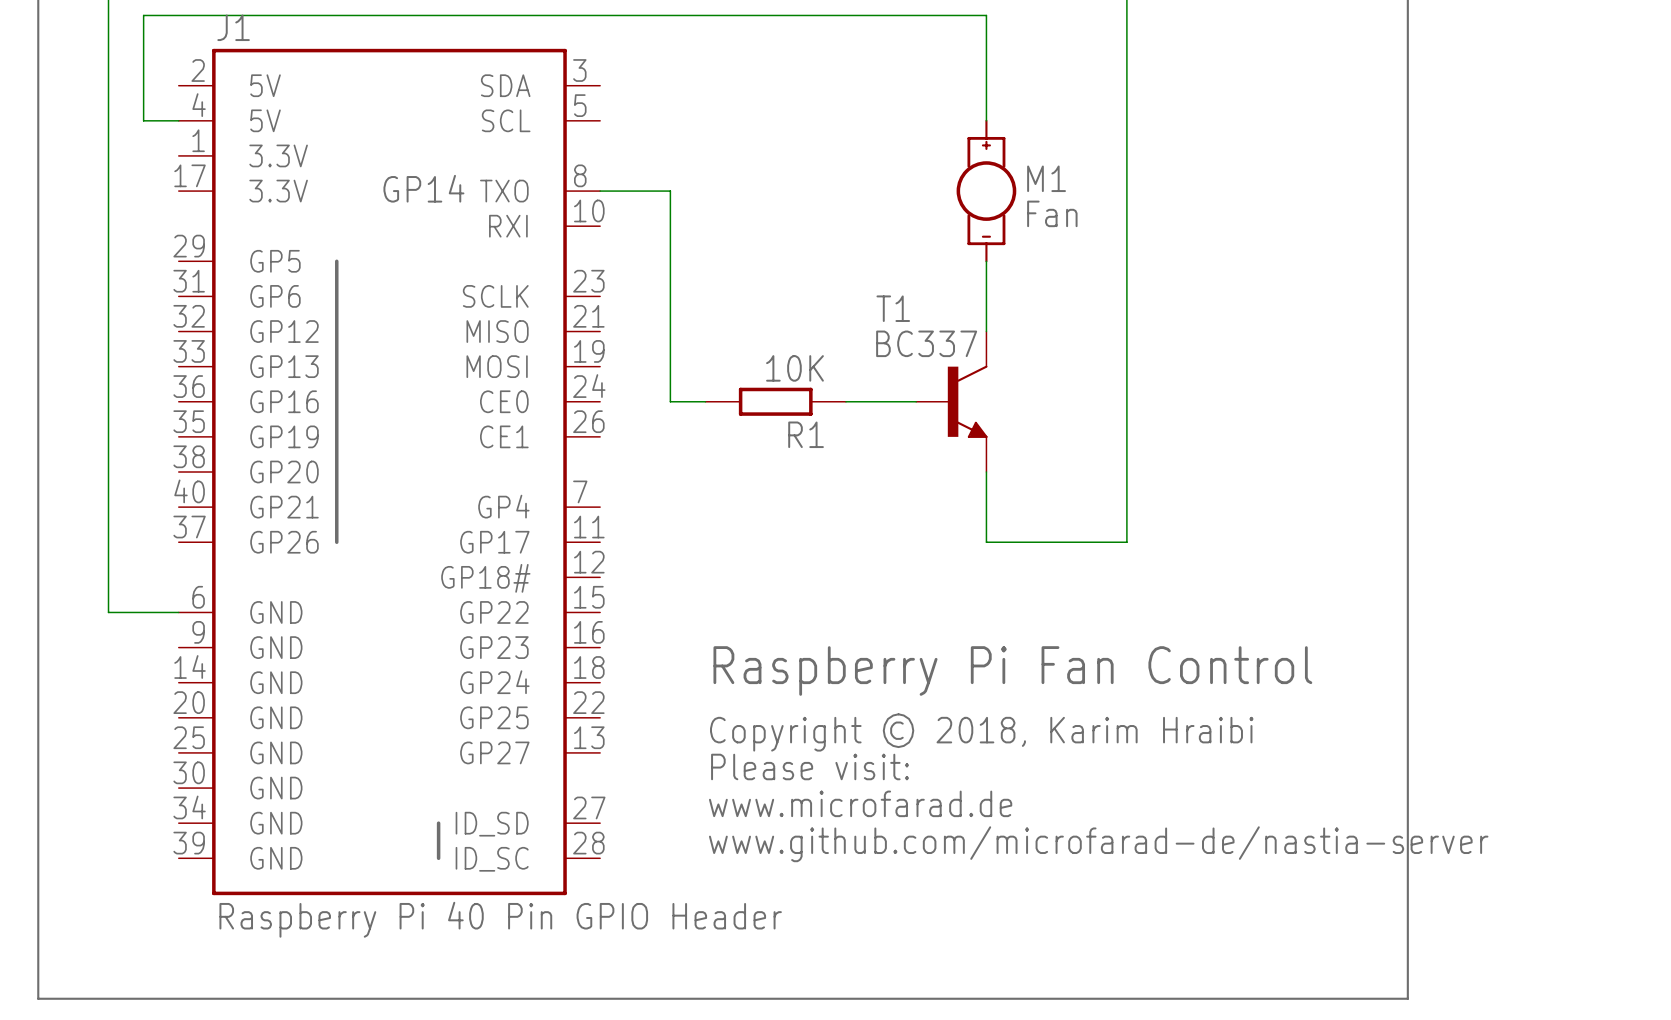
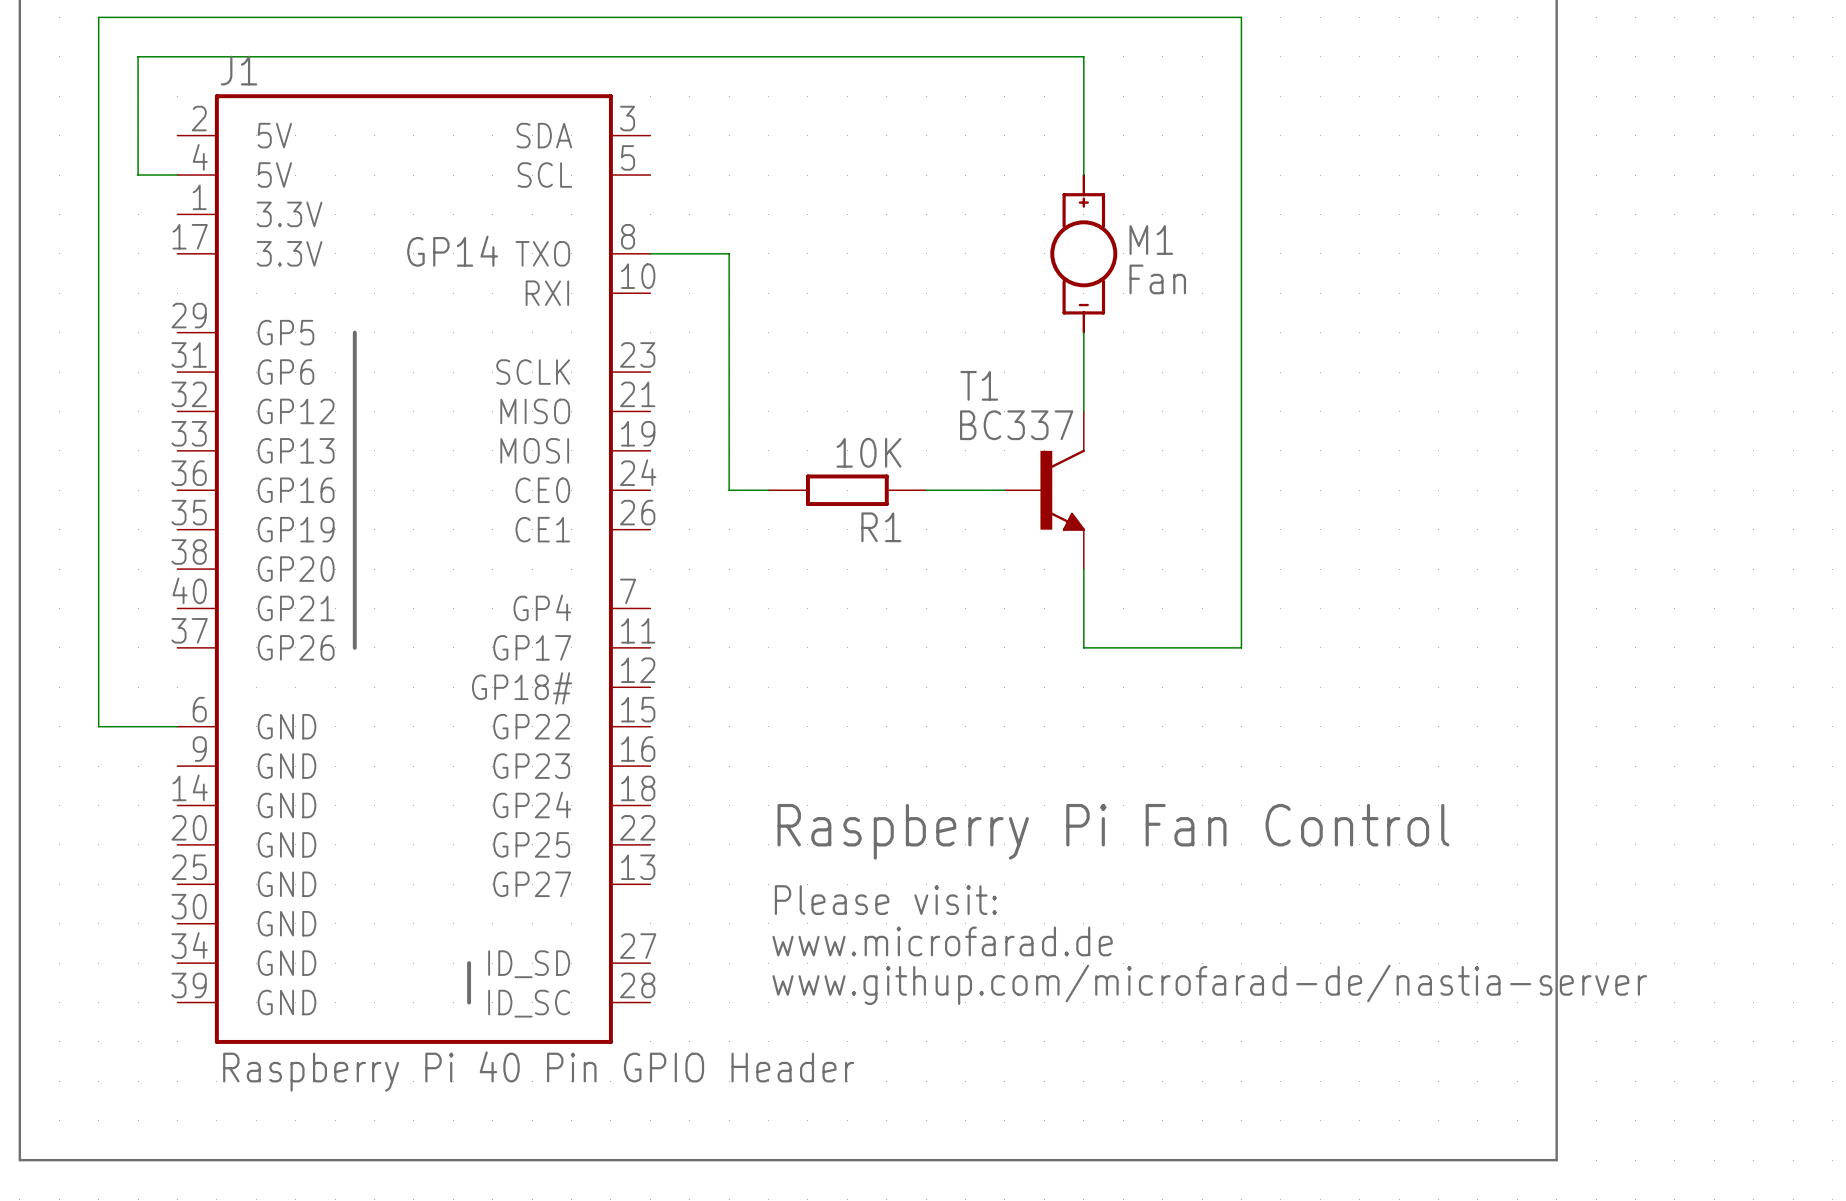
text position: Raspberry Pi Fan Control (1012, 671) -> Raspberry Pi Fan Control (1113, 831)
text: Copyright © 2018, Karim Hraibi (981, 732) -> none
text: www.github.com/microfarad-de/nastia-server (1098, 844) -> www.githup.com/microfarad-de/nastia-server (1209, 984)

